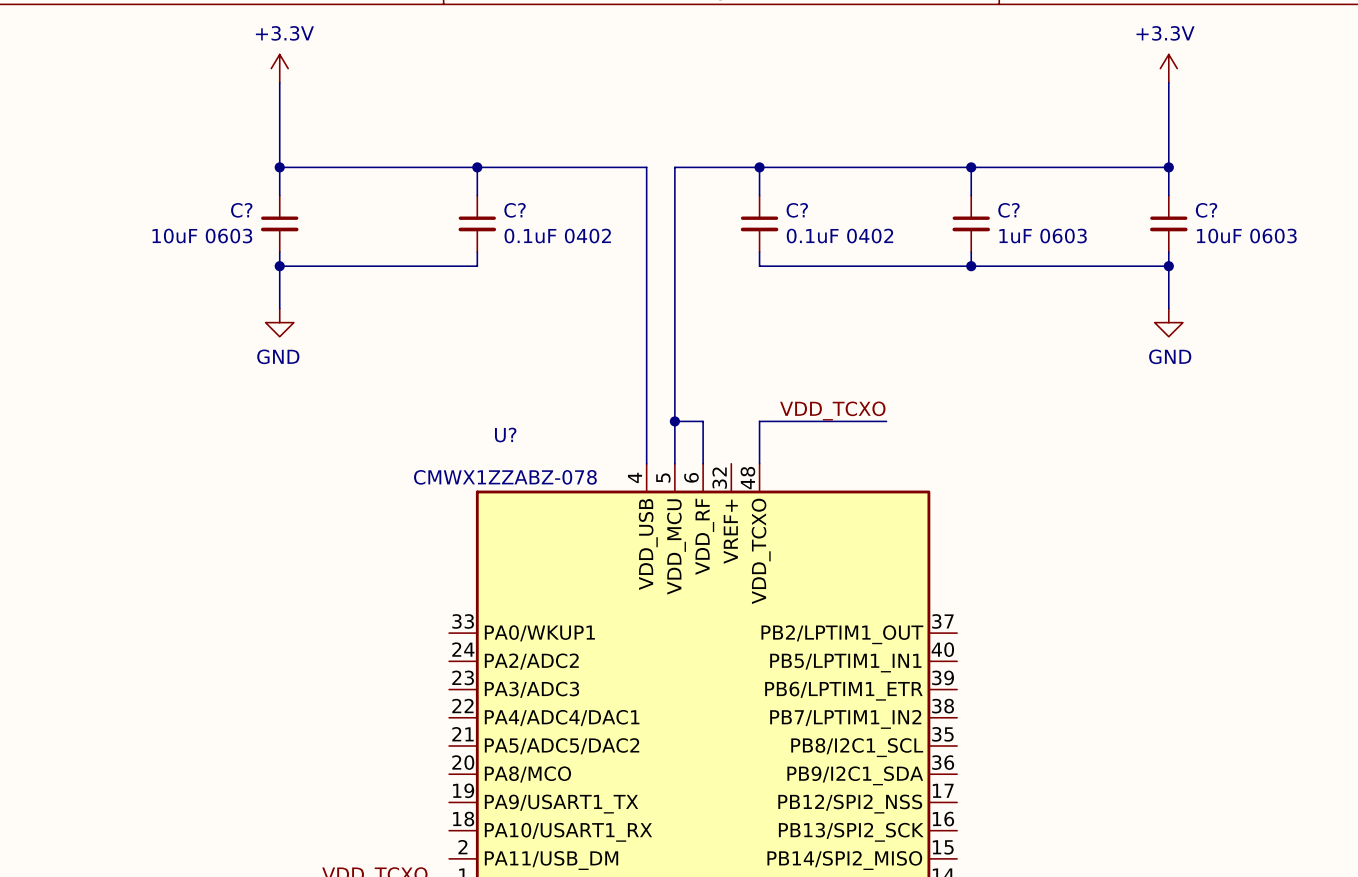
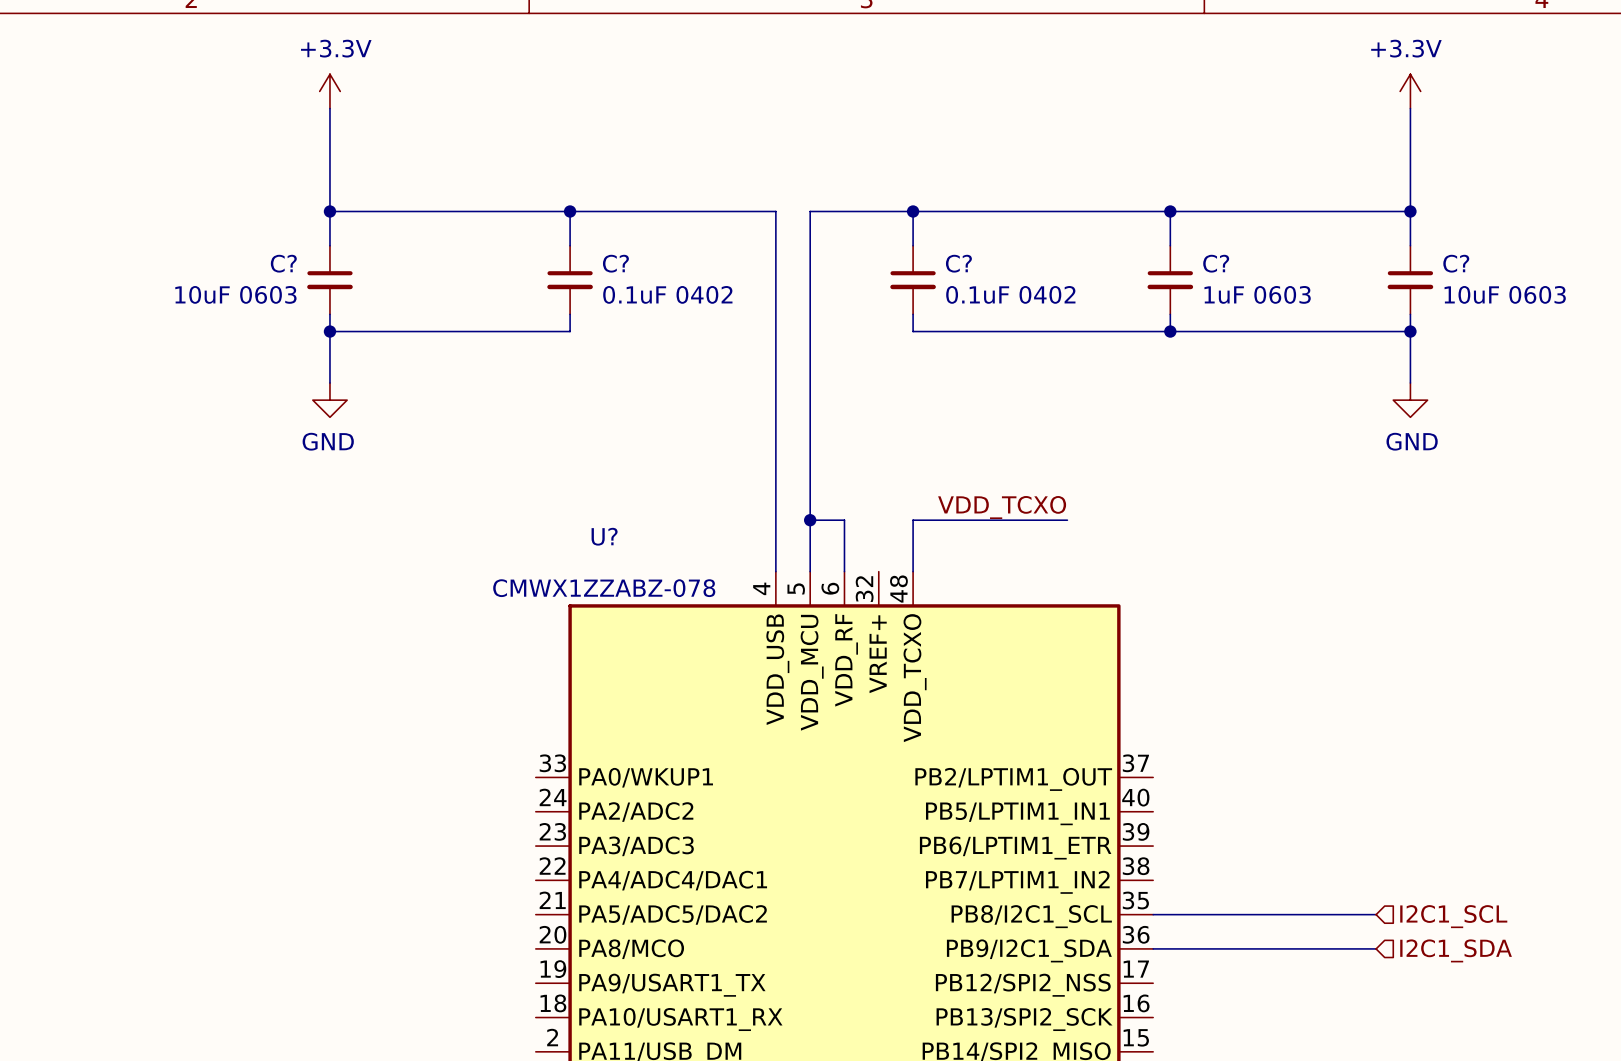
wire: none -> (1153, 914) (1376, 914)
hierarchical label: none -> I2C1_SCL (1453, 916)
wire: none -> (1153, 948) (1376, 948)
hierarchical label: none -> I2C1_SDA (1456, 950)

